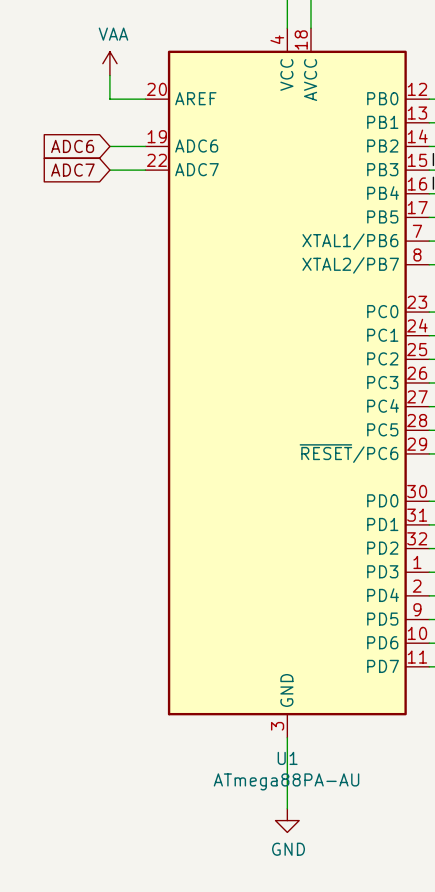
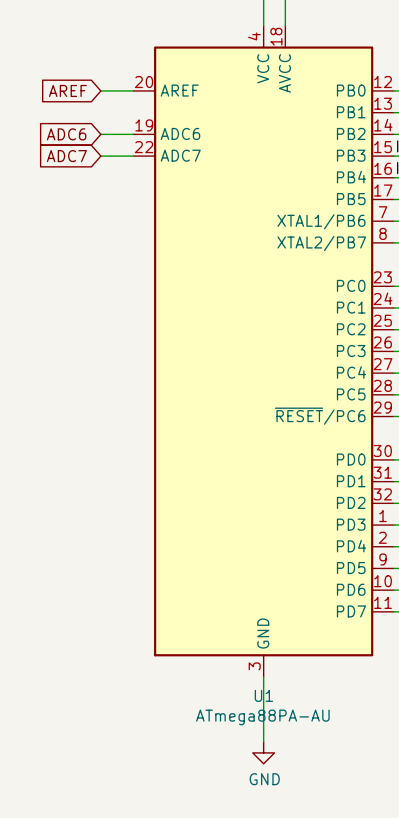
power symbol: VAA (109, 63) -> none
wire: (109, 75) (109, 99) -> none
global label: none -> AREF (67, 90)

